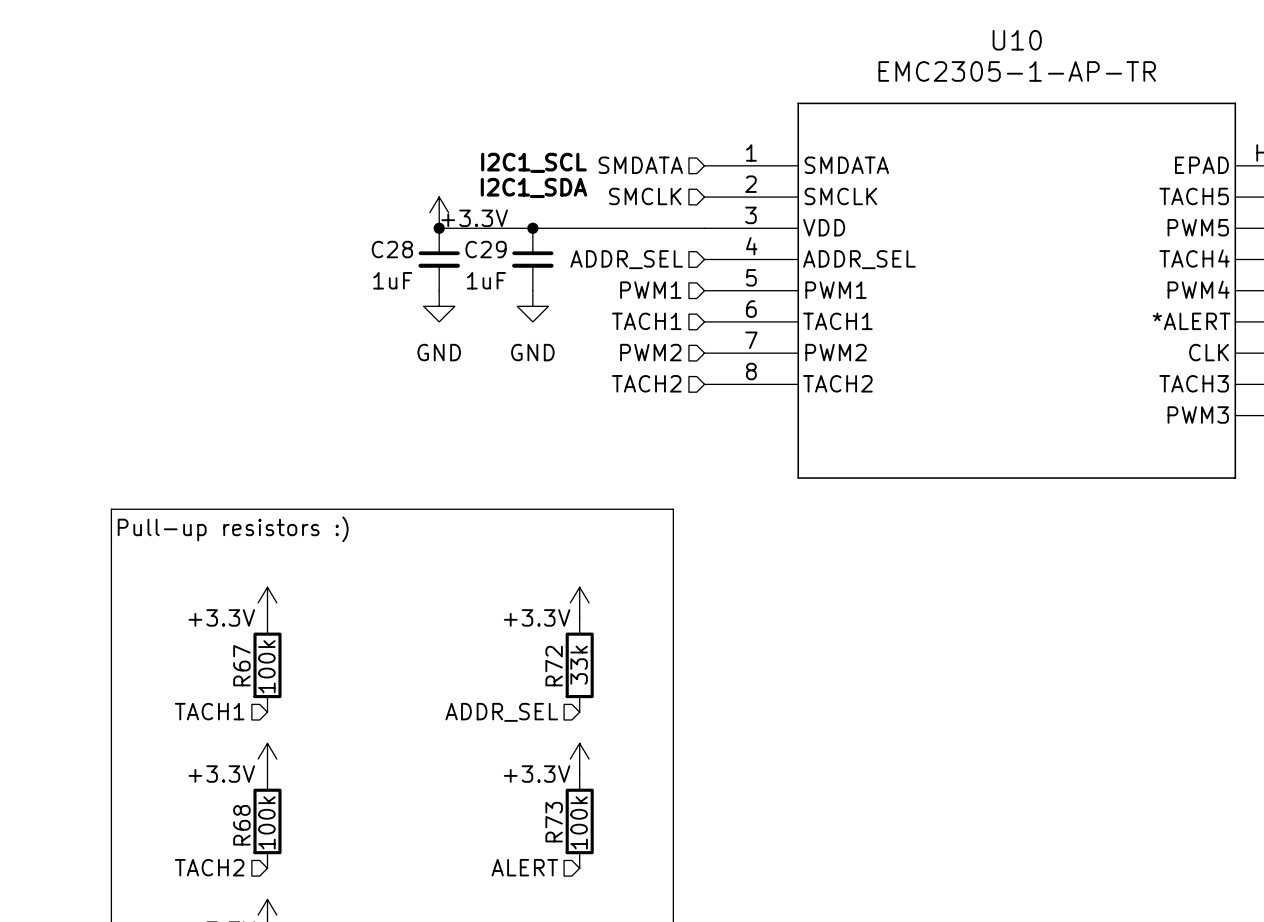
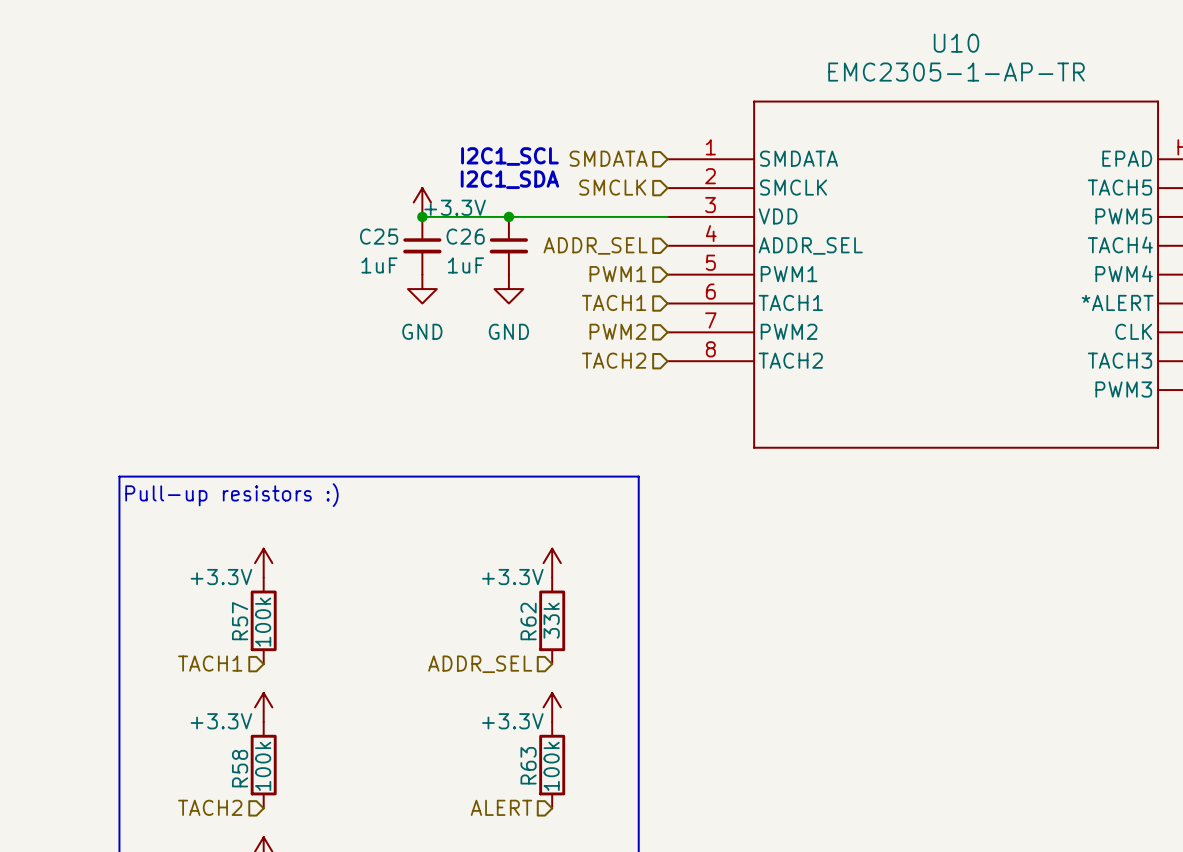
C28 name: C28 (392, 249) -> C25 (379, 236)
C29 name: C29 (486, 249) -> C26 (465, 236)
R67 name: R67 (241, 665) -> R57 (240, 621)
R72 name: R72 (554, 666) -> R62 (528, 621)
R73 name: R73 (554, 822) -> R63 (528, 765)
R68 name: R68 (241, 825) -> R58 (240, 768)

